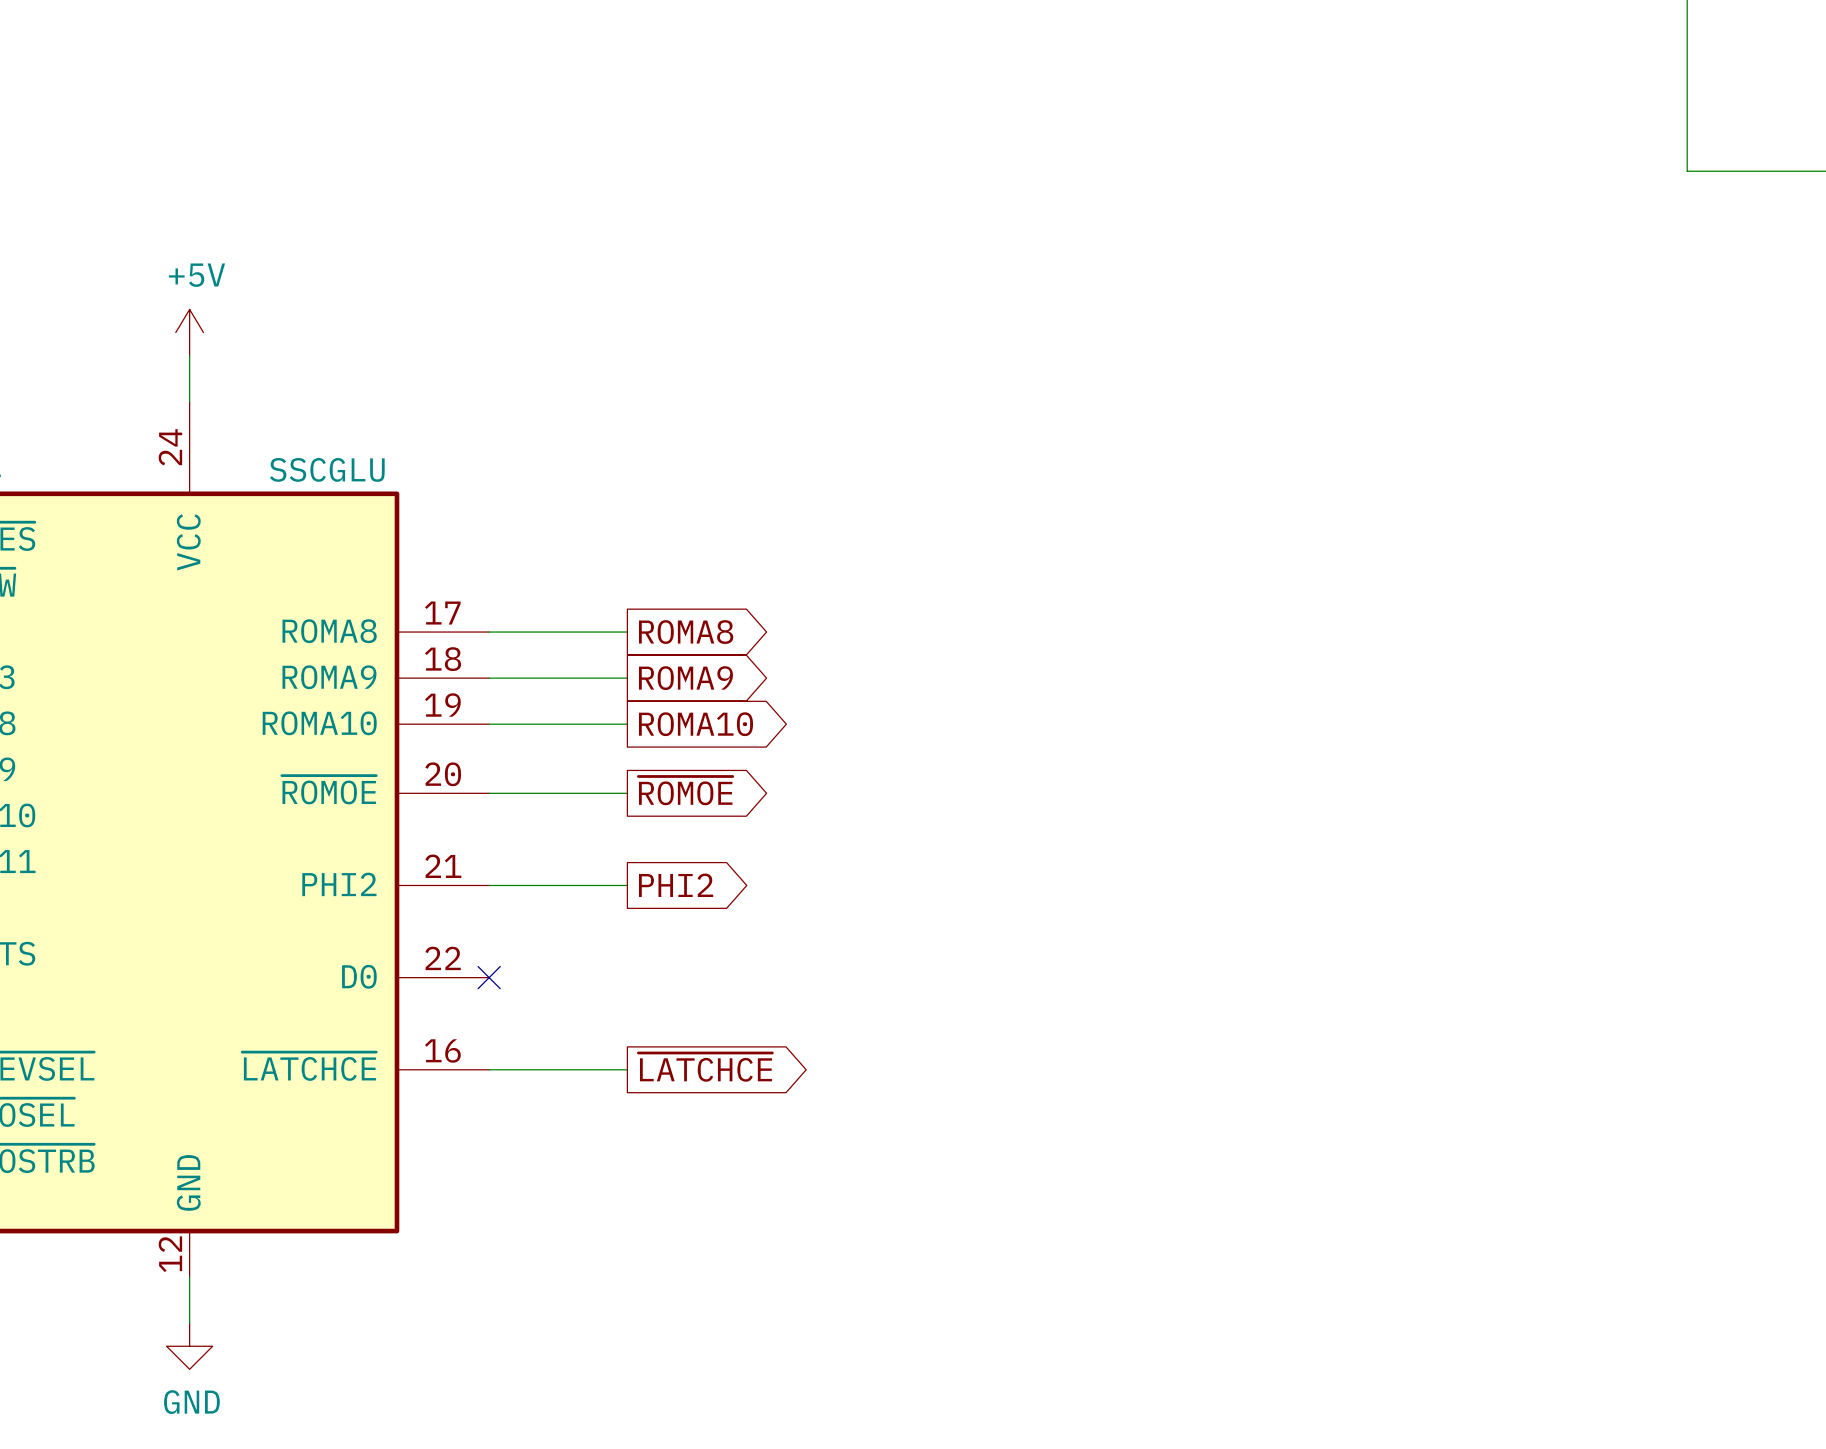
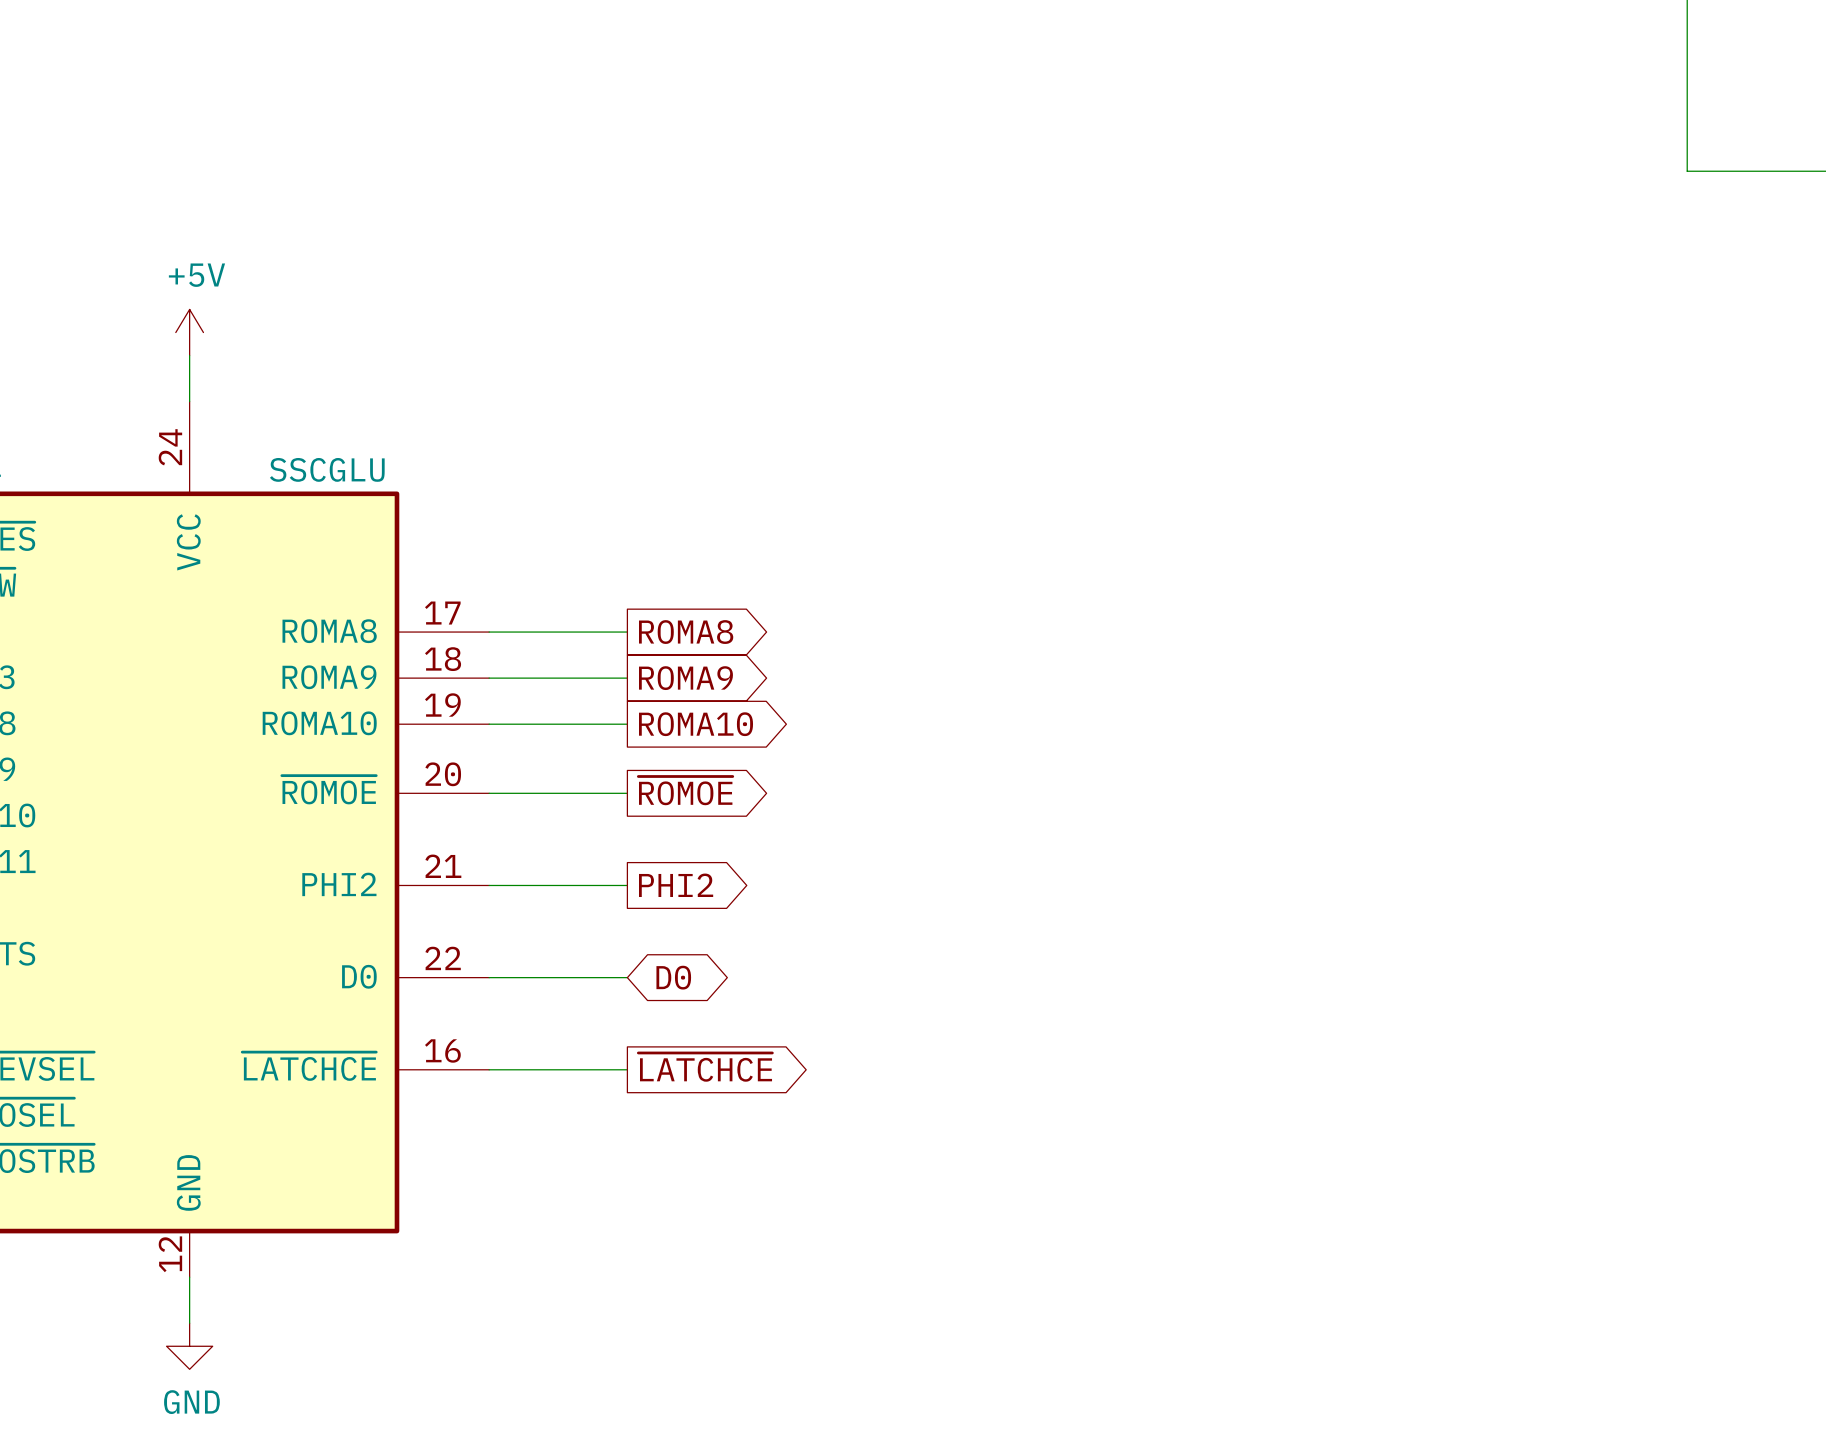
wire: none -> (489, 977) (627, 977)
no-connect mark: (489, 977) -> none
global label: none -> D0 (673, 977)

